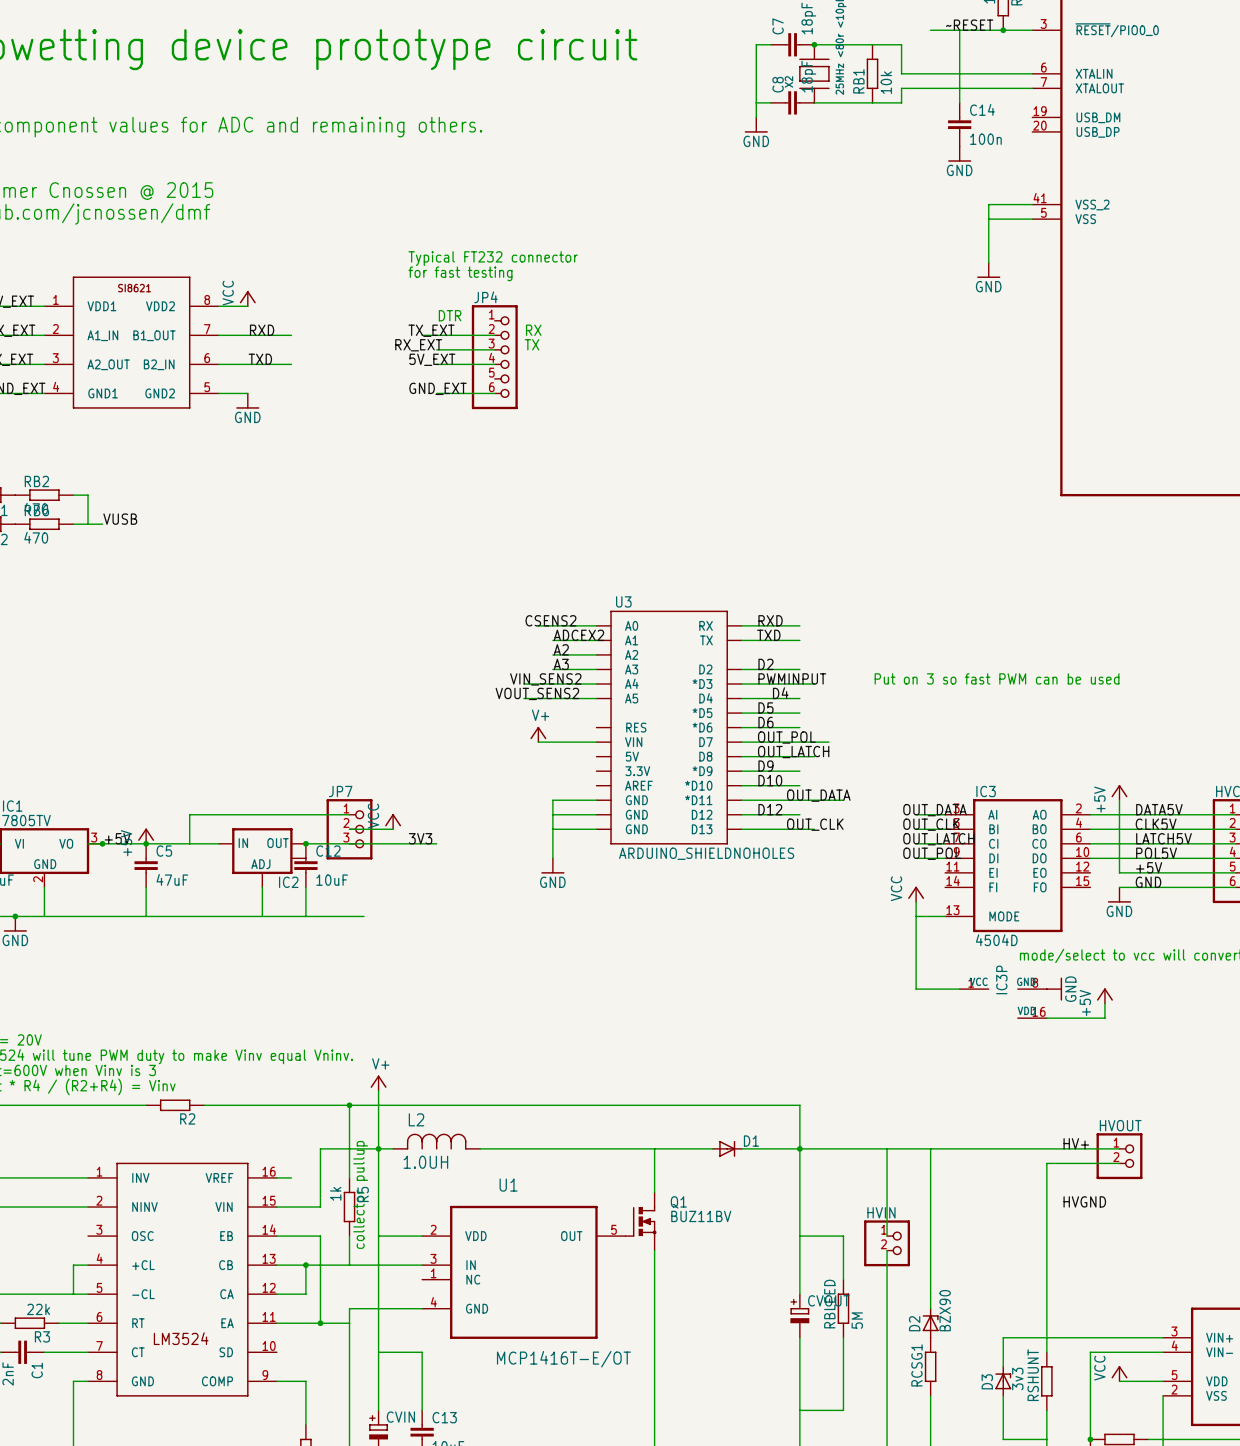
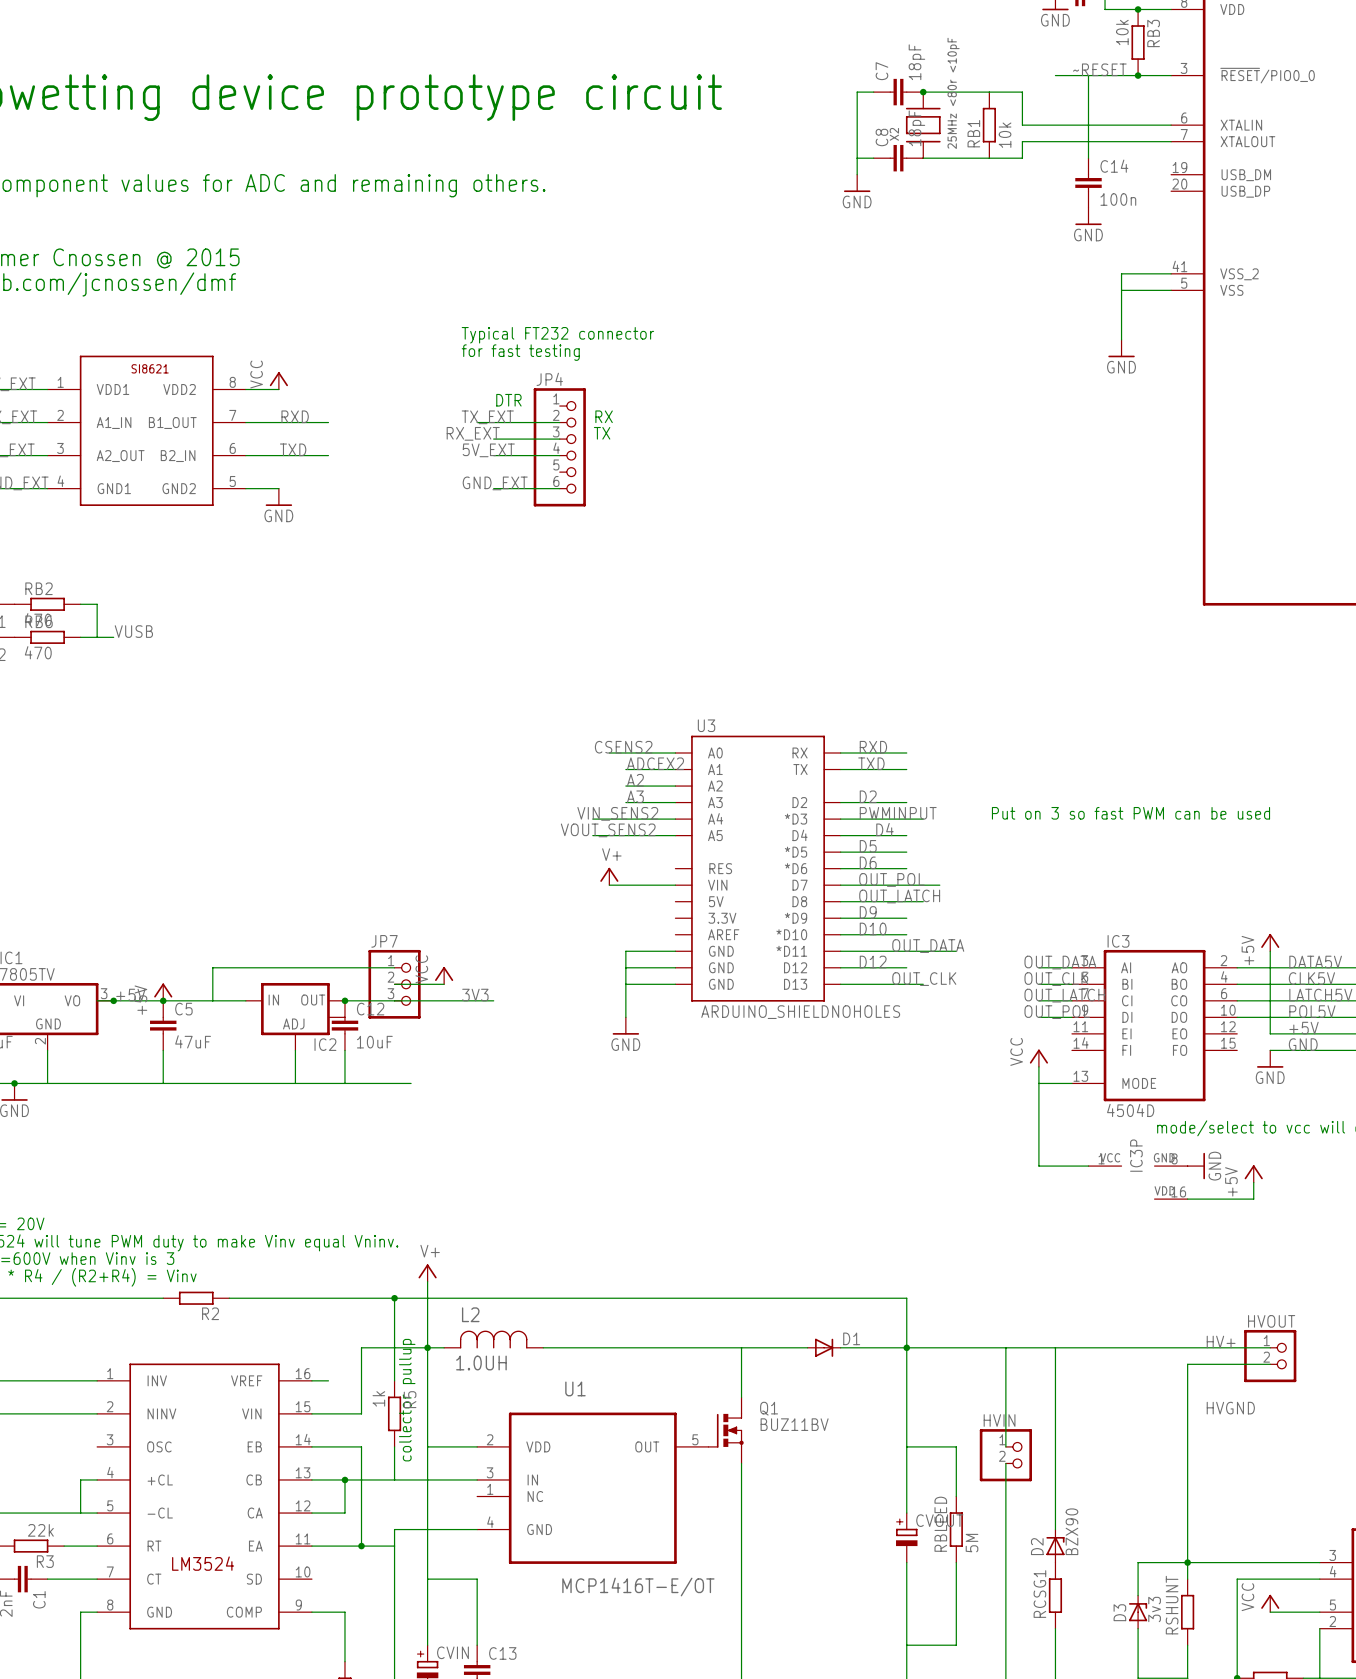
junction: none -> (1187, 1562)

